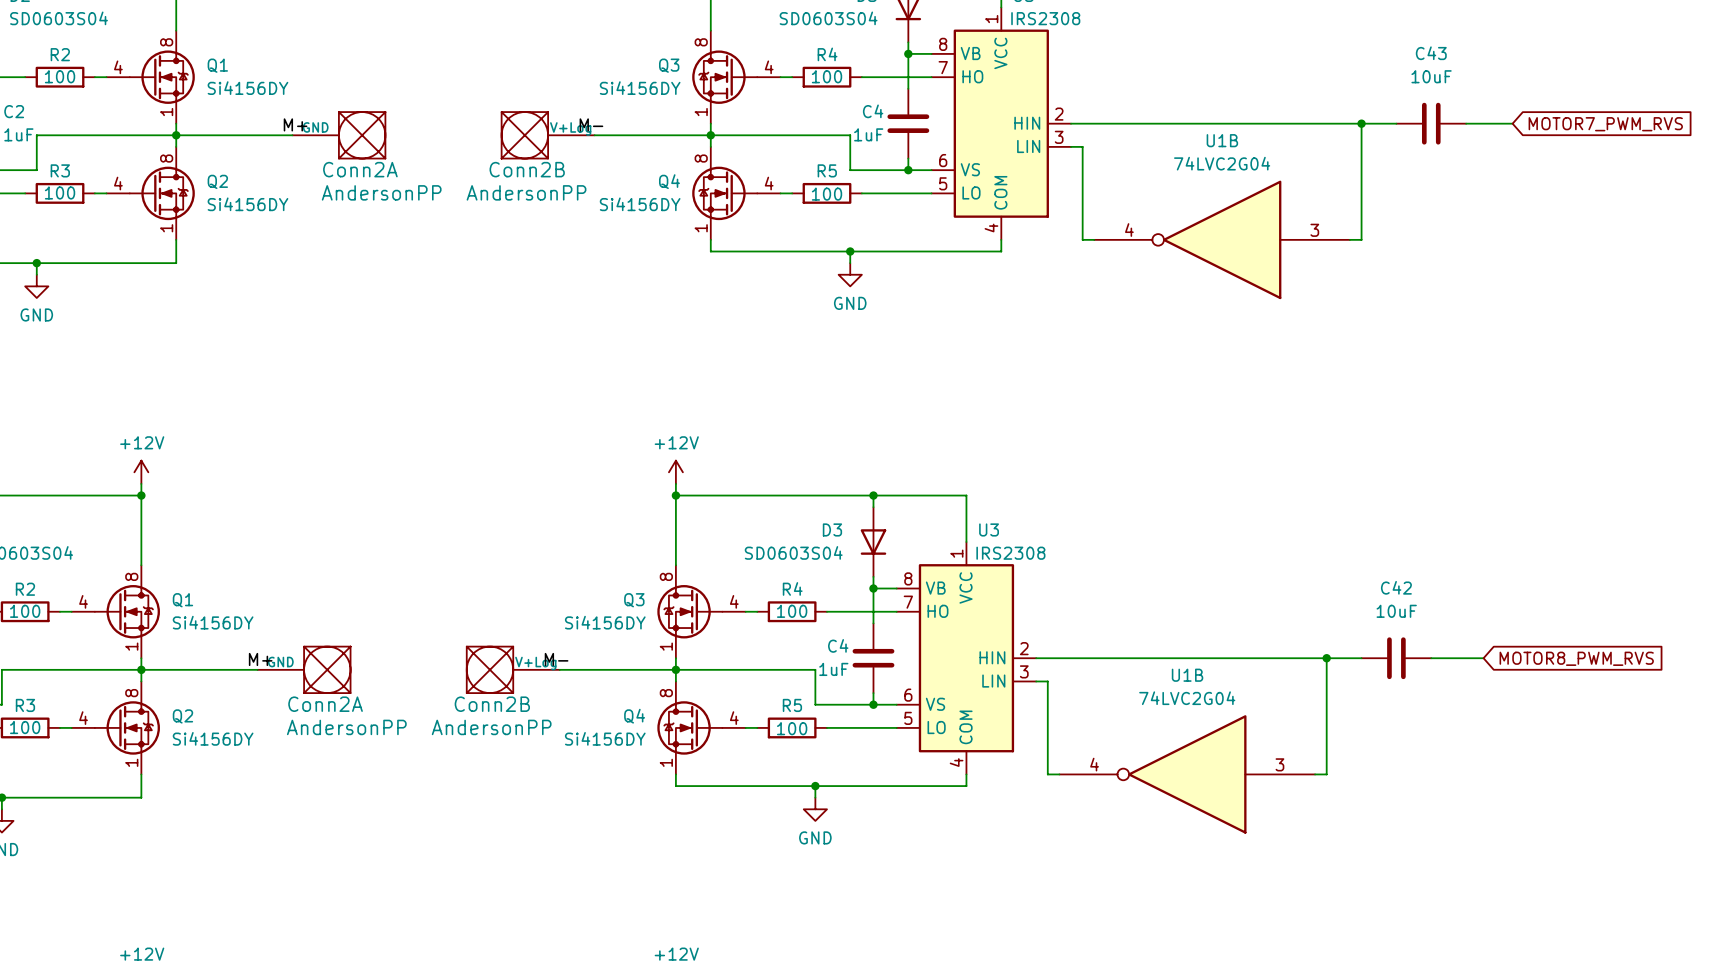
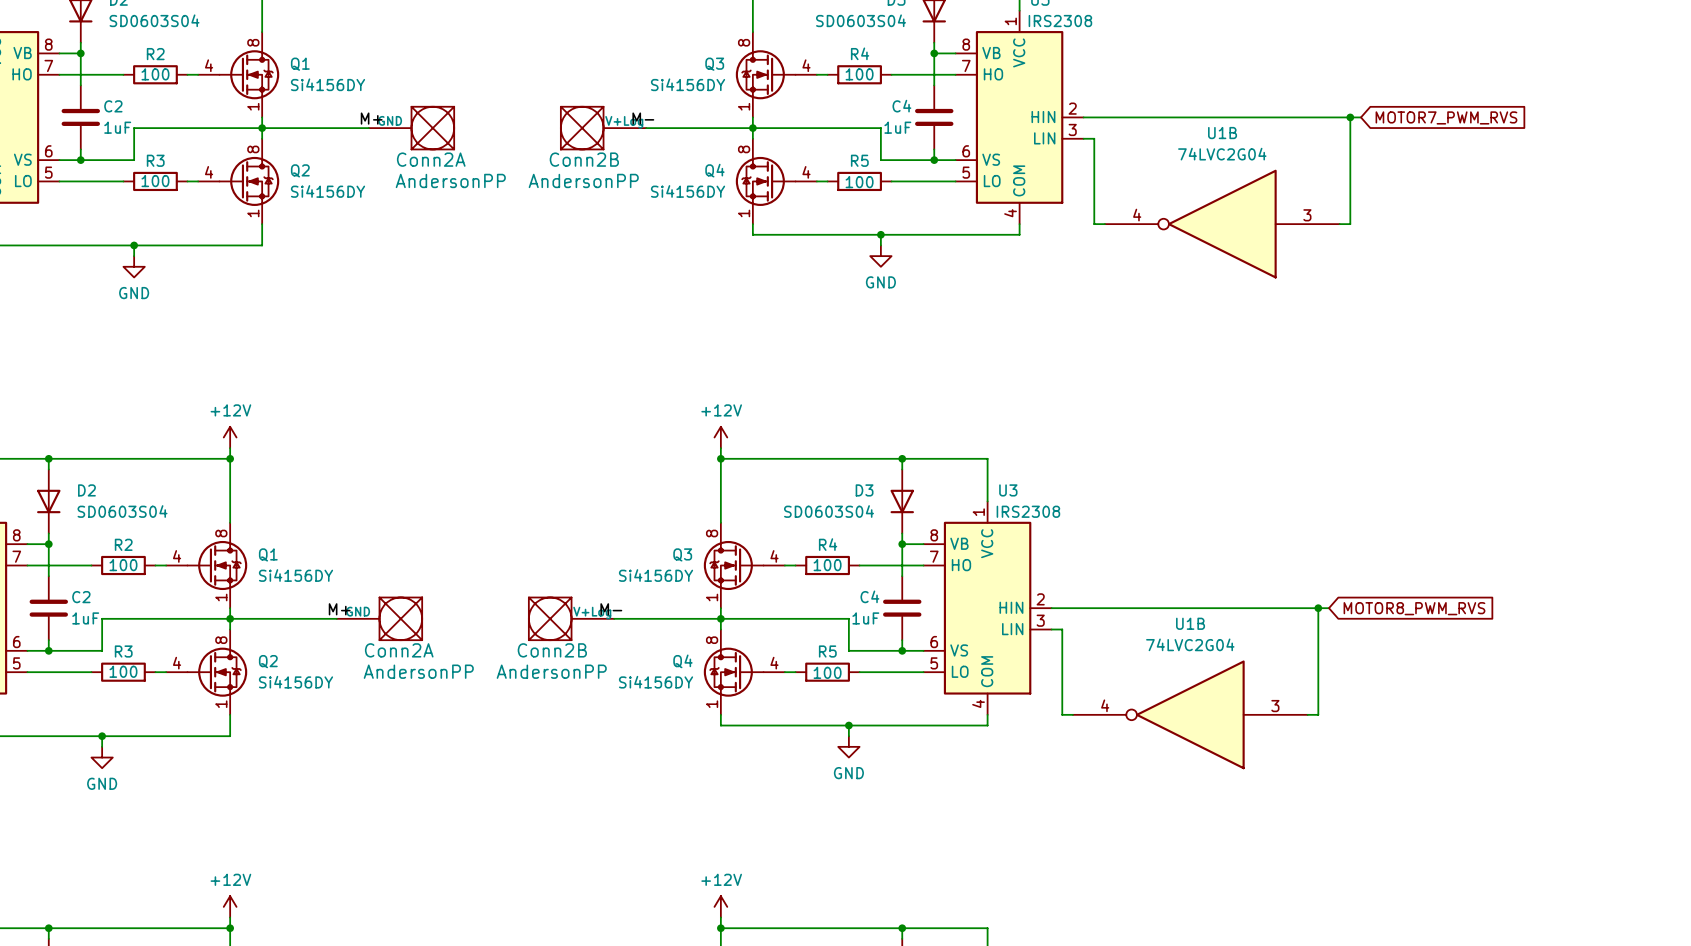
wire: (1373, 123) (1396, 123) -> none
C43: 10uF (1431, 123) -> none
wire: (1466, 123) (1512, 123) -> none
global label position: MOTOR7_PWM_RVS (1605, 124) -> MOTOR7_PWM_RVS (1446, 117)
wire: (1338, 658) (1361, 658) -> none
C42: 10uF (1396, 658) -> none
wire: (1431, 658) (1483, 658) -> none
global label position: MOTOR8_PWM_RVS (1576, 658) -> MOTOR8_PWM_RVS (1414, 608)

